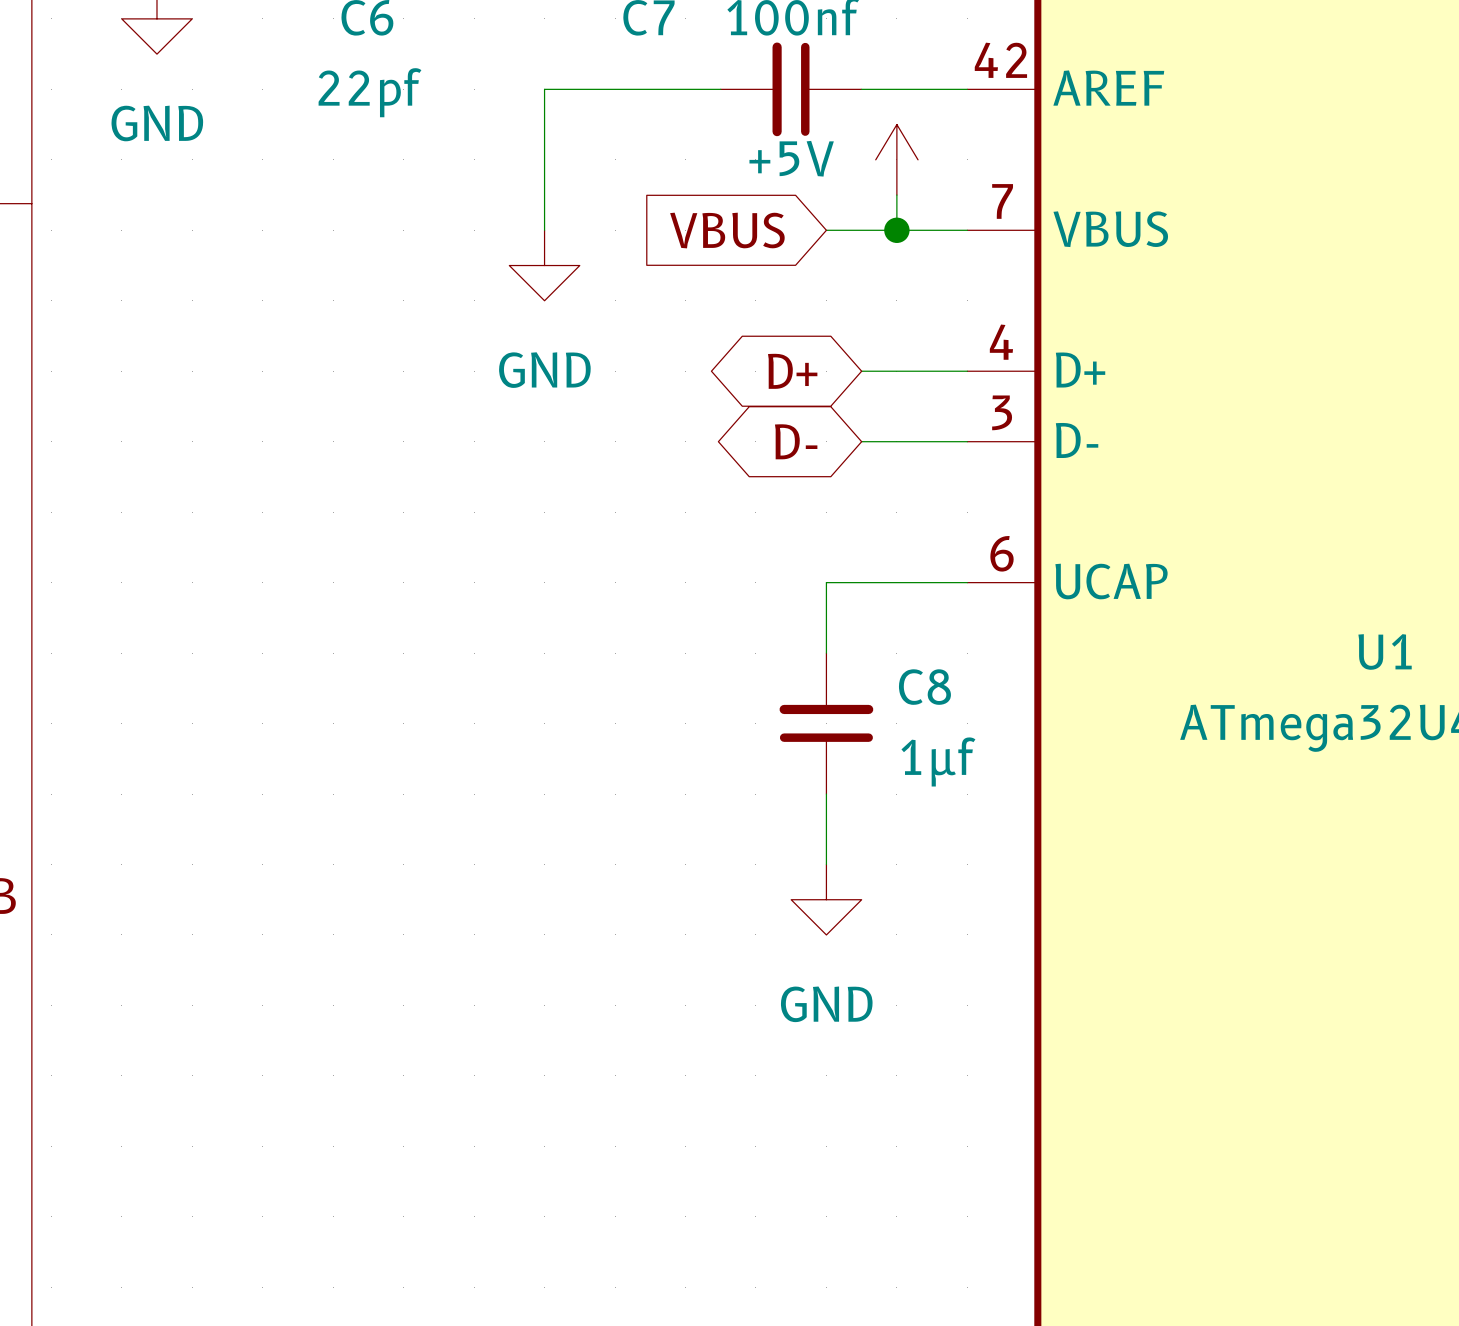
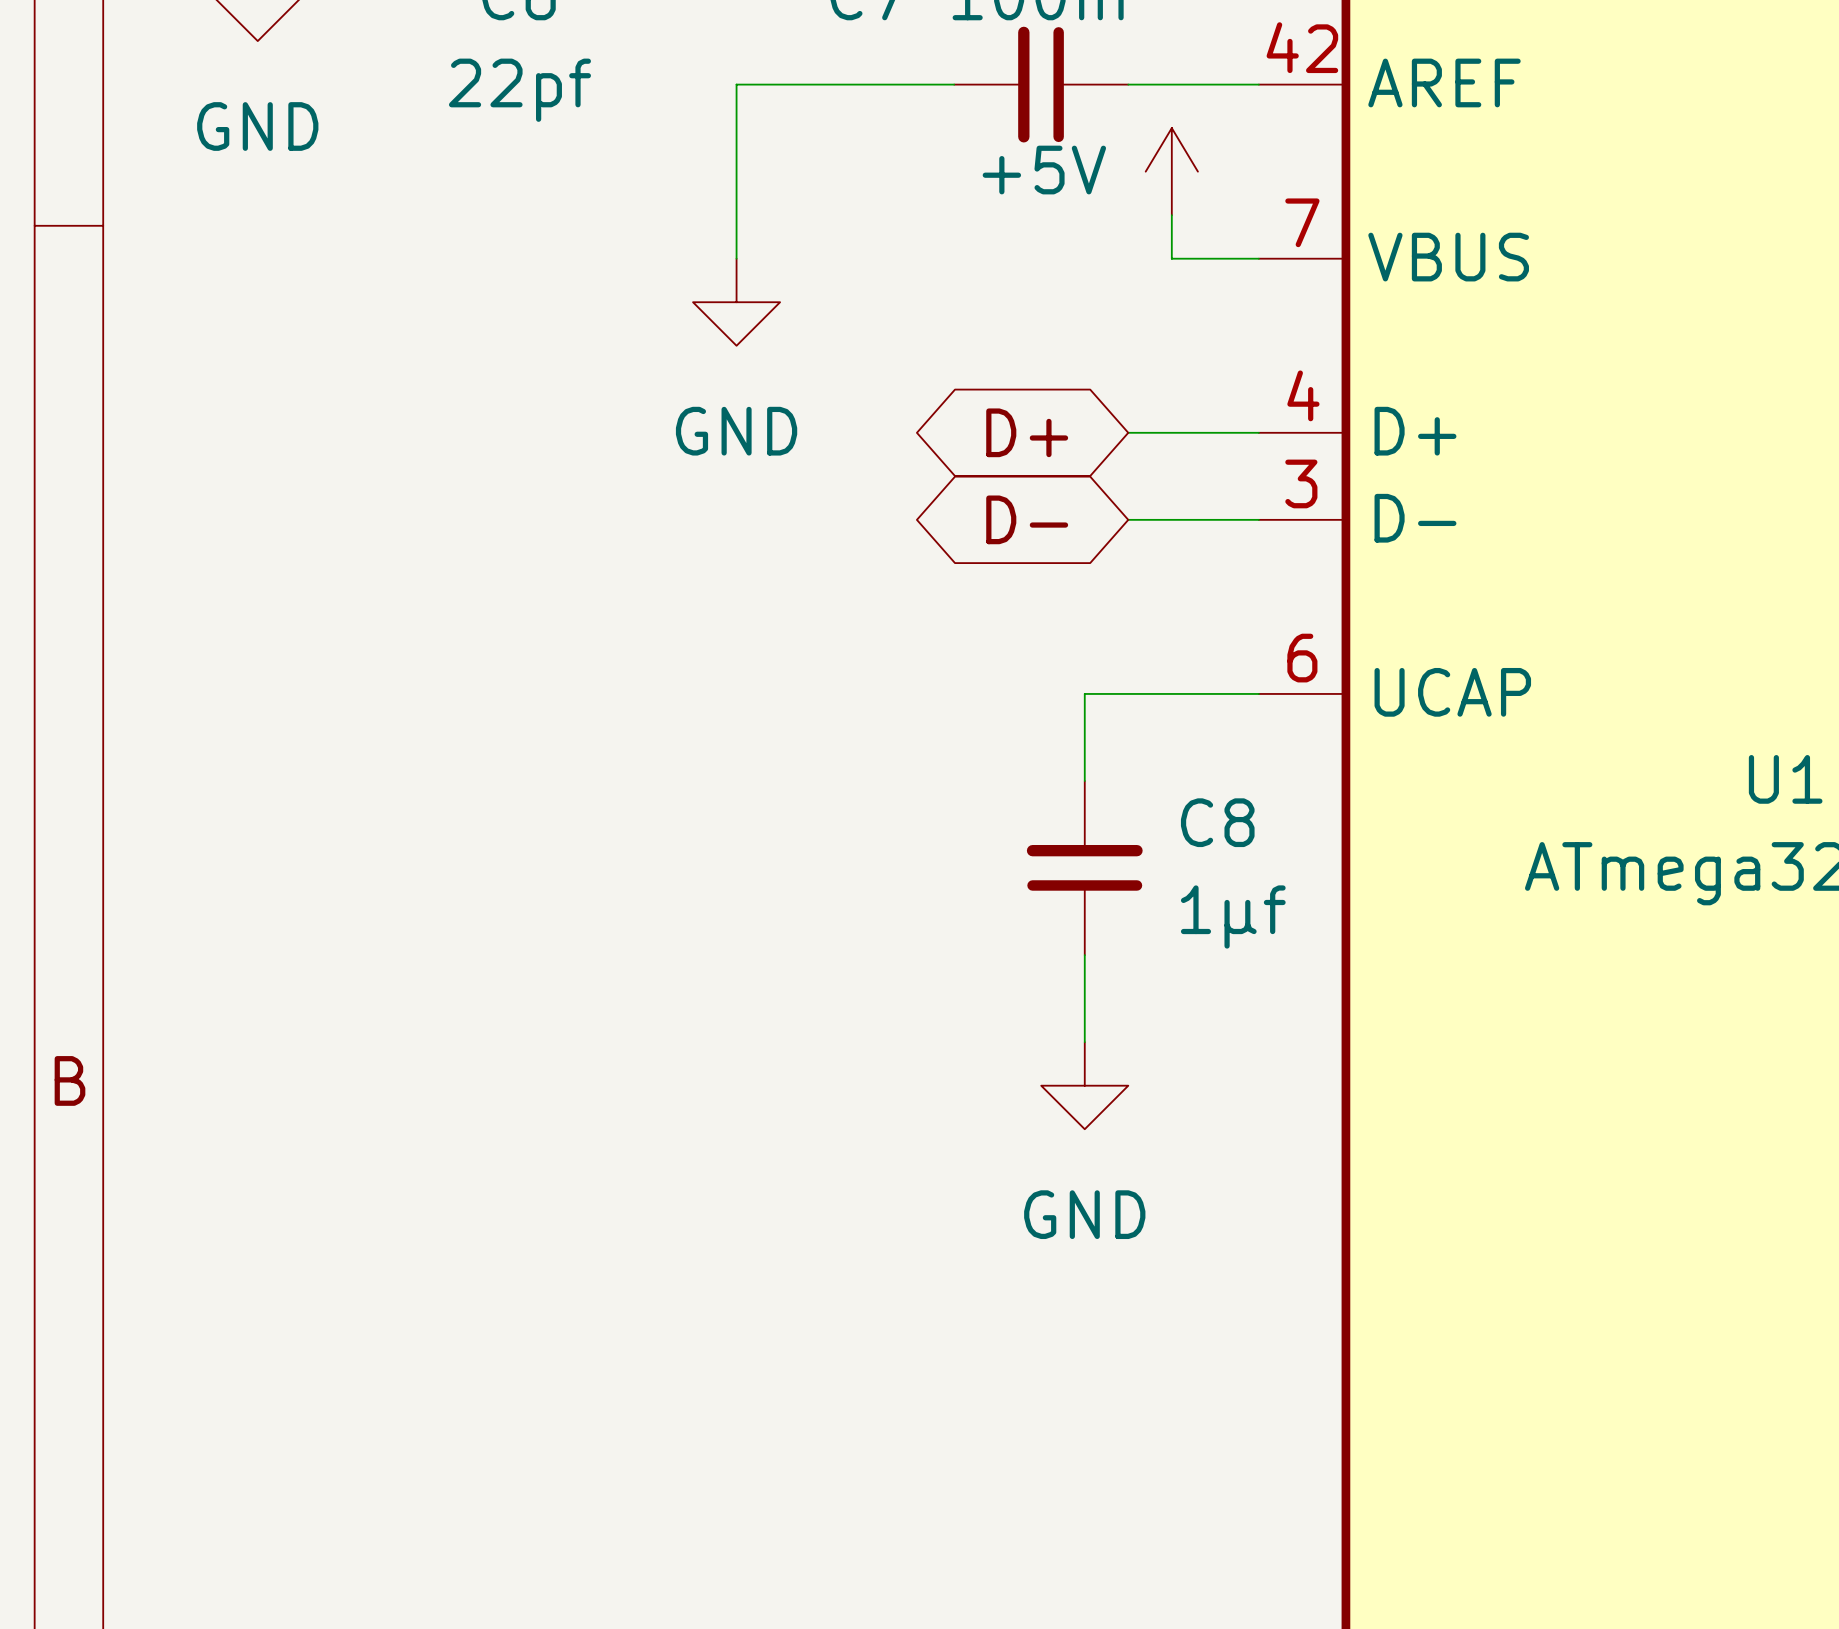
global label: VBUS (727, 230) -> none
wire: (826, 230) (896, 230) -> none
junction: (896, 230) -> none

